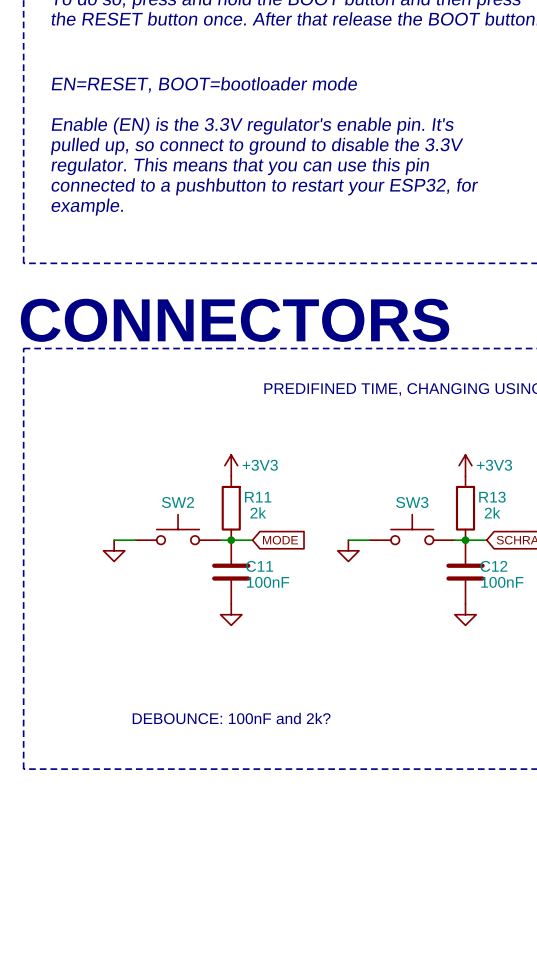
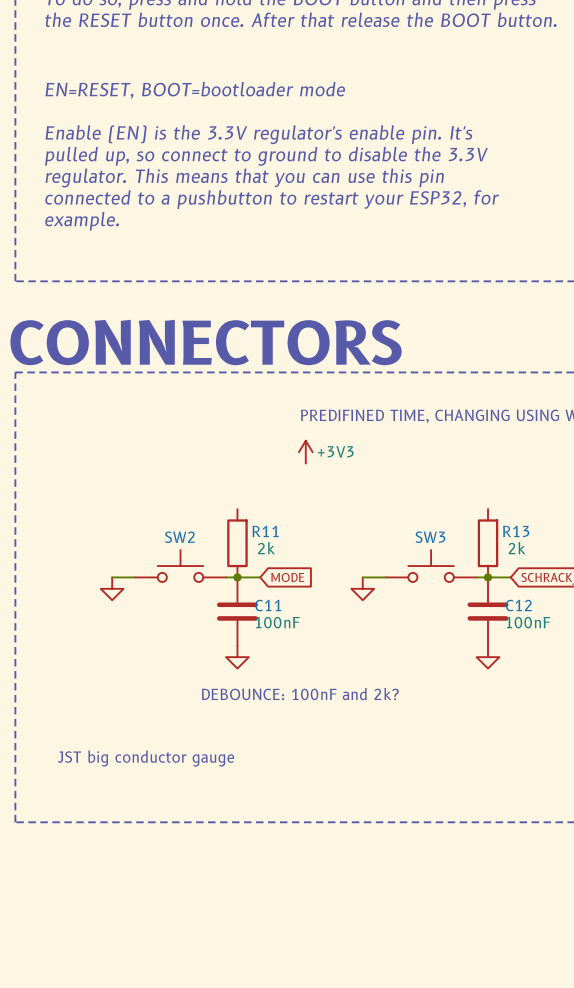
power symbol position: +3V3 (231, 465) -> +3V3 (305, 452)
power symbol: +3V3 (465, 465) -> none
text: none -> JST big conductor gauge (145, 758)
text position: DEBOUNCE: 100nF and 2k? (231, 718) -> DEBOUNCE: 100nF and 2k? (300, 694)

